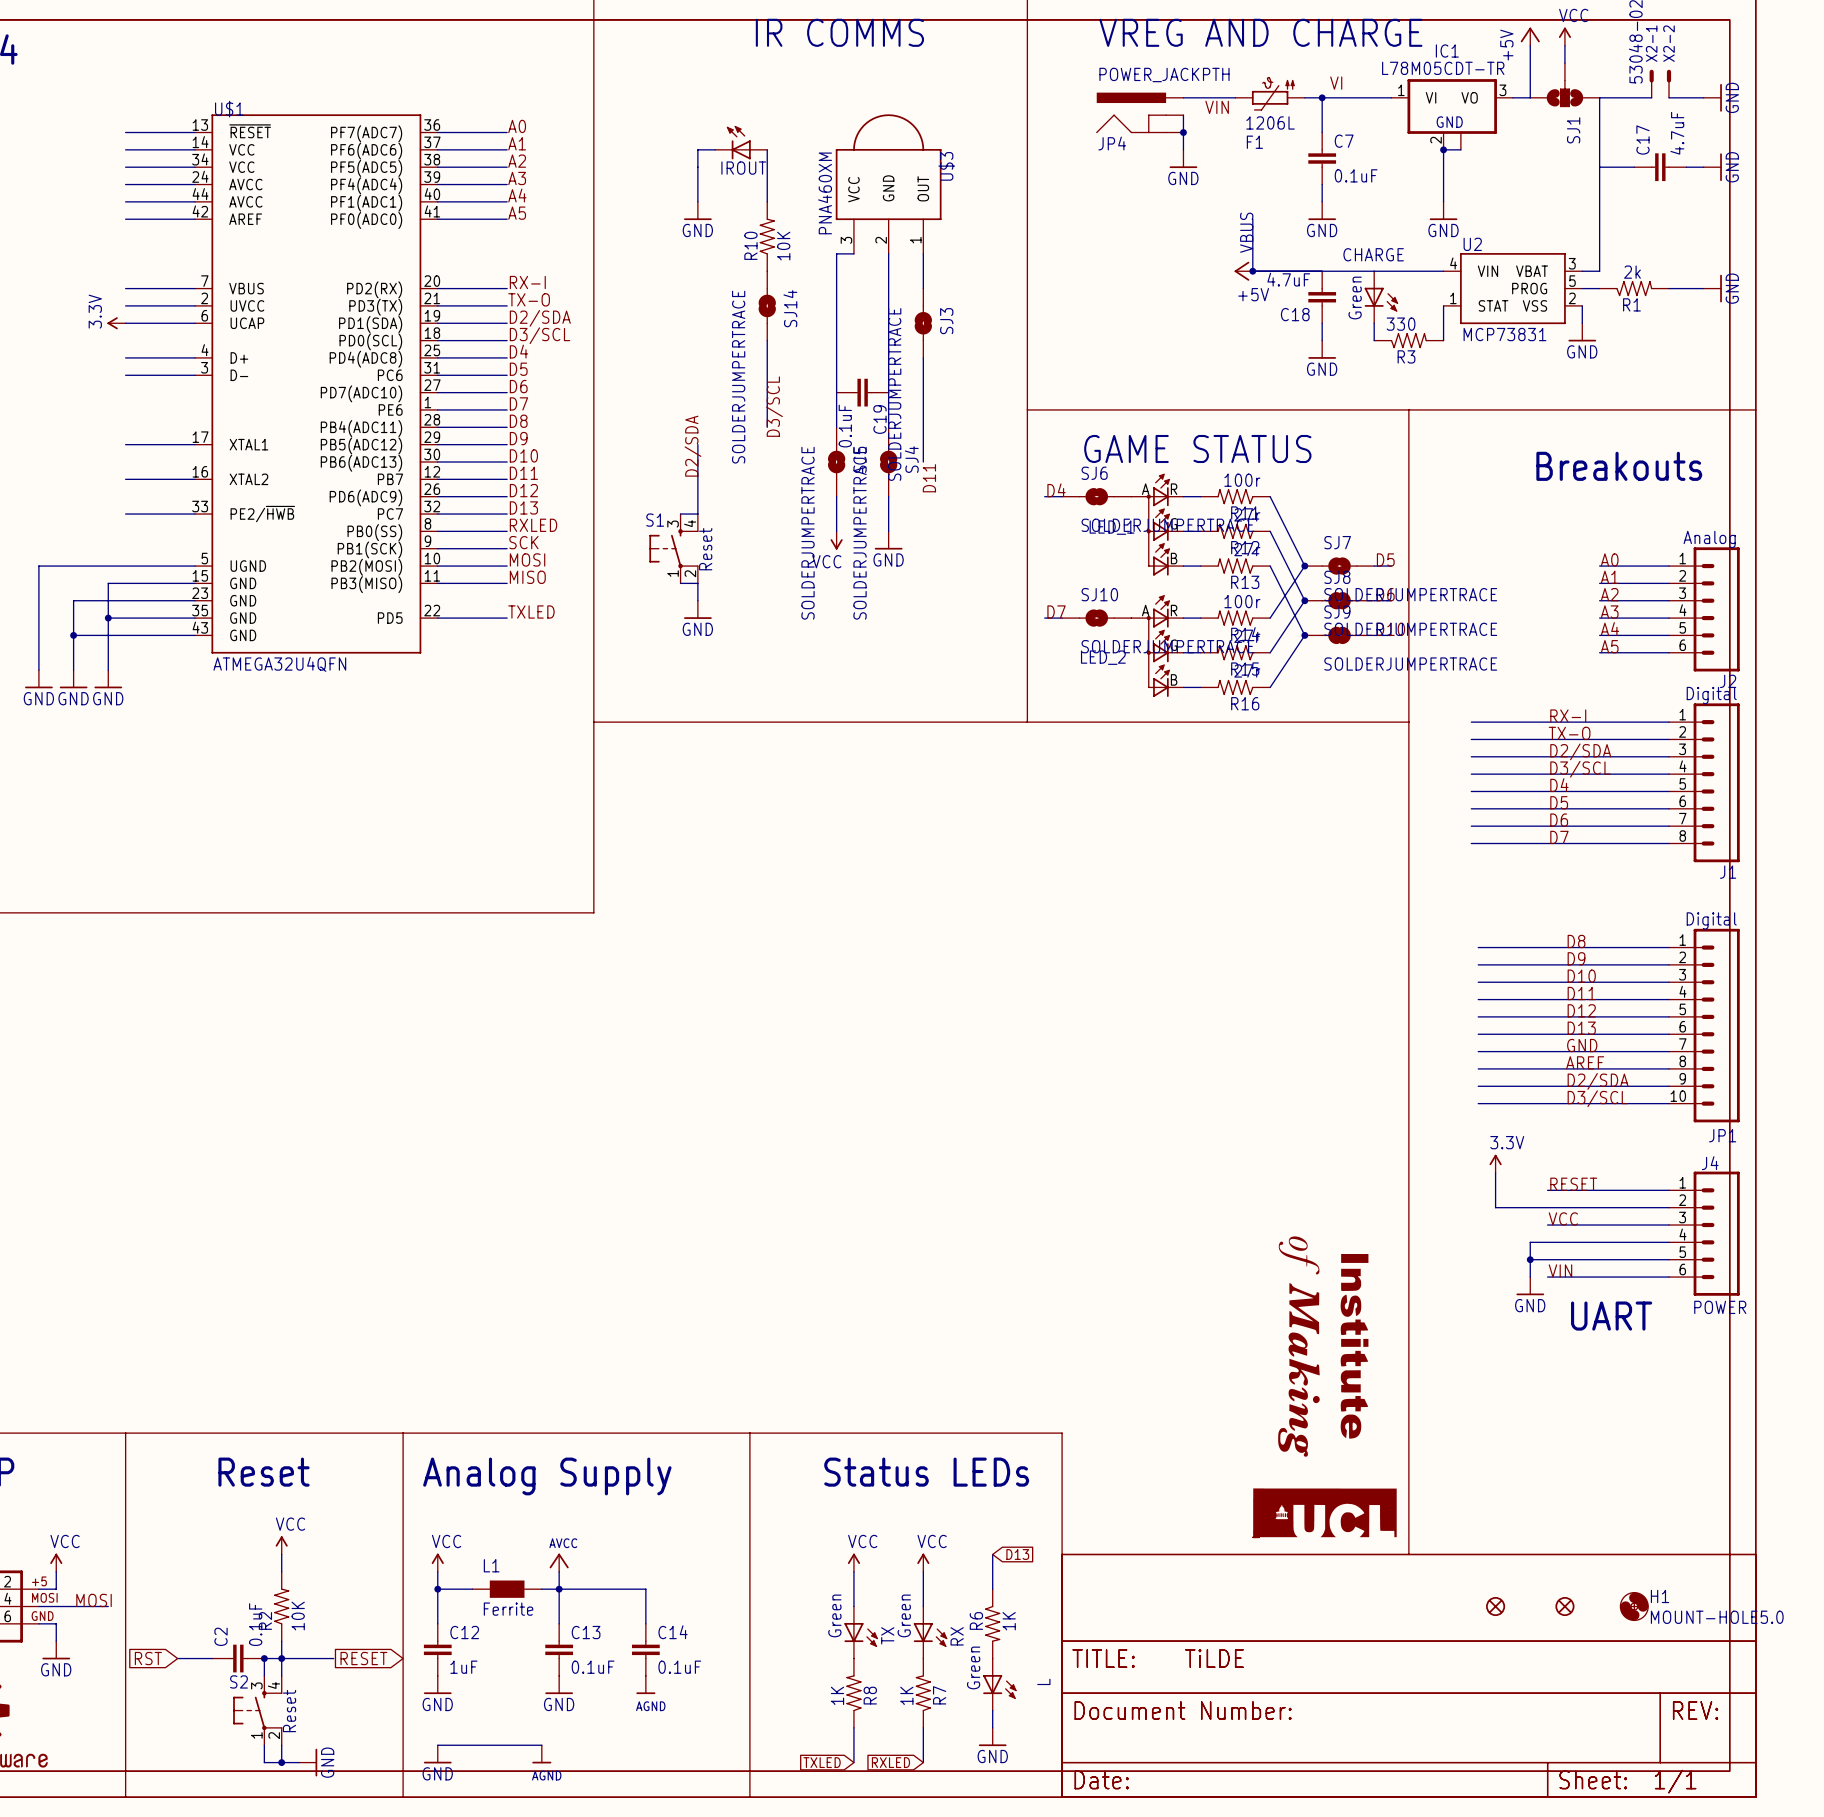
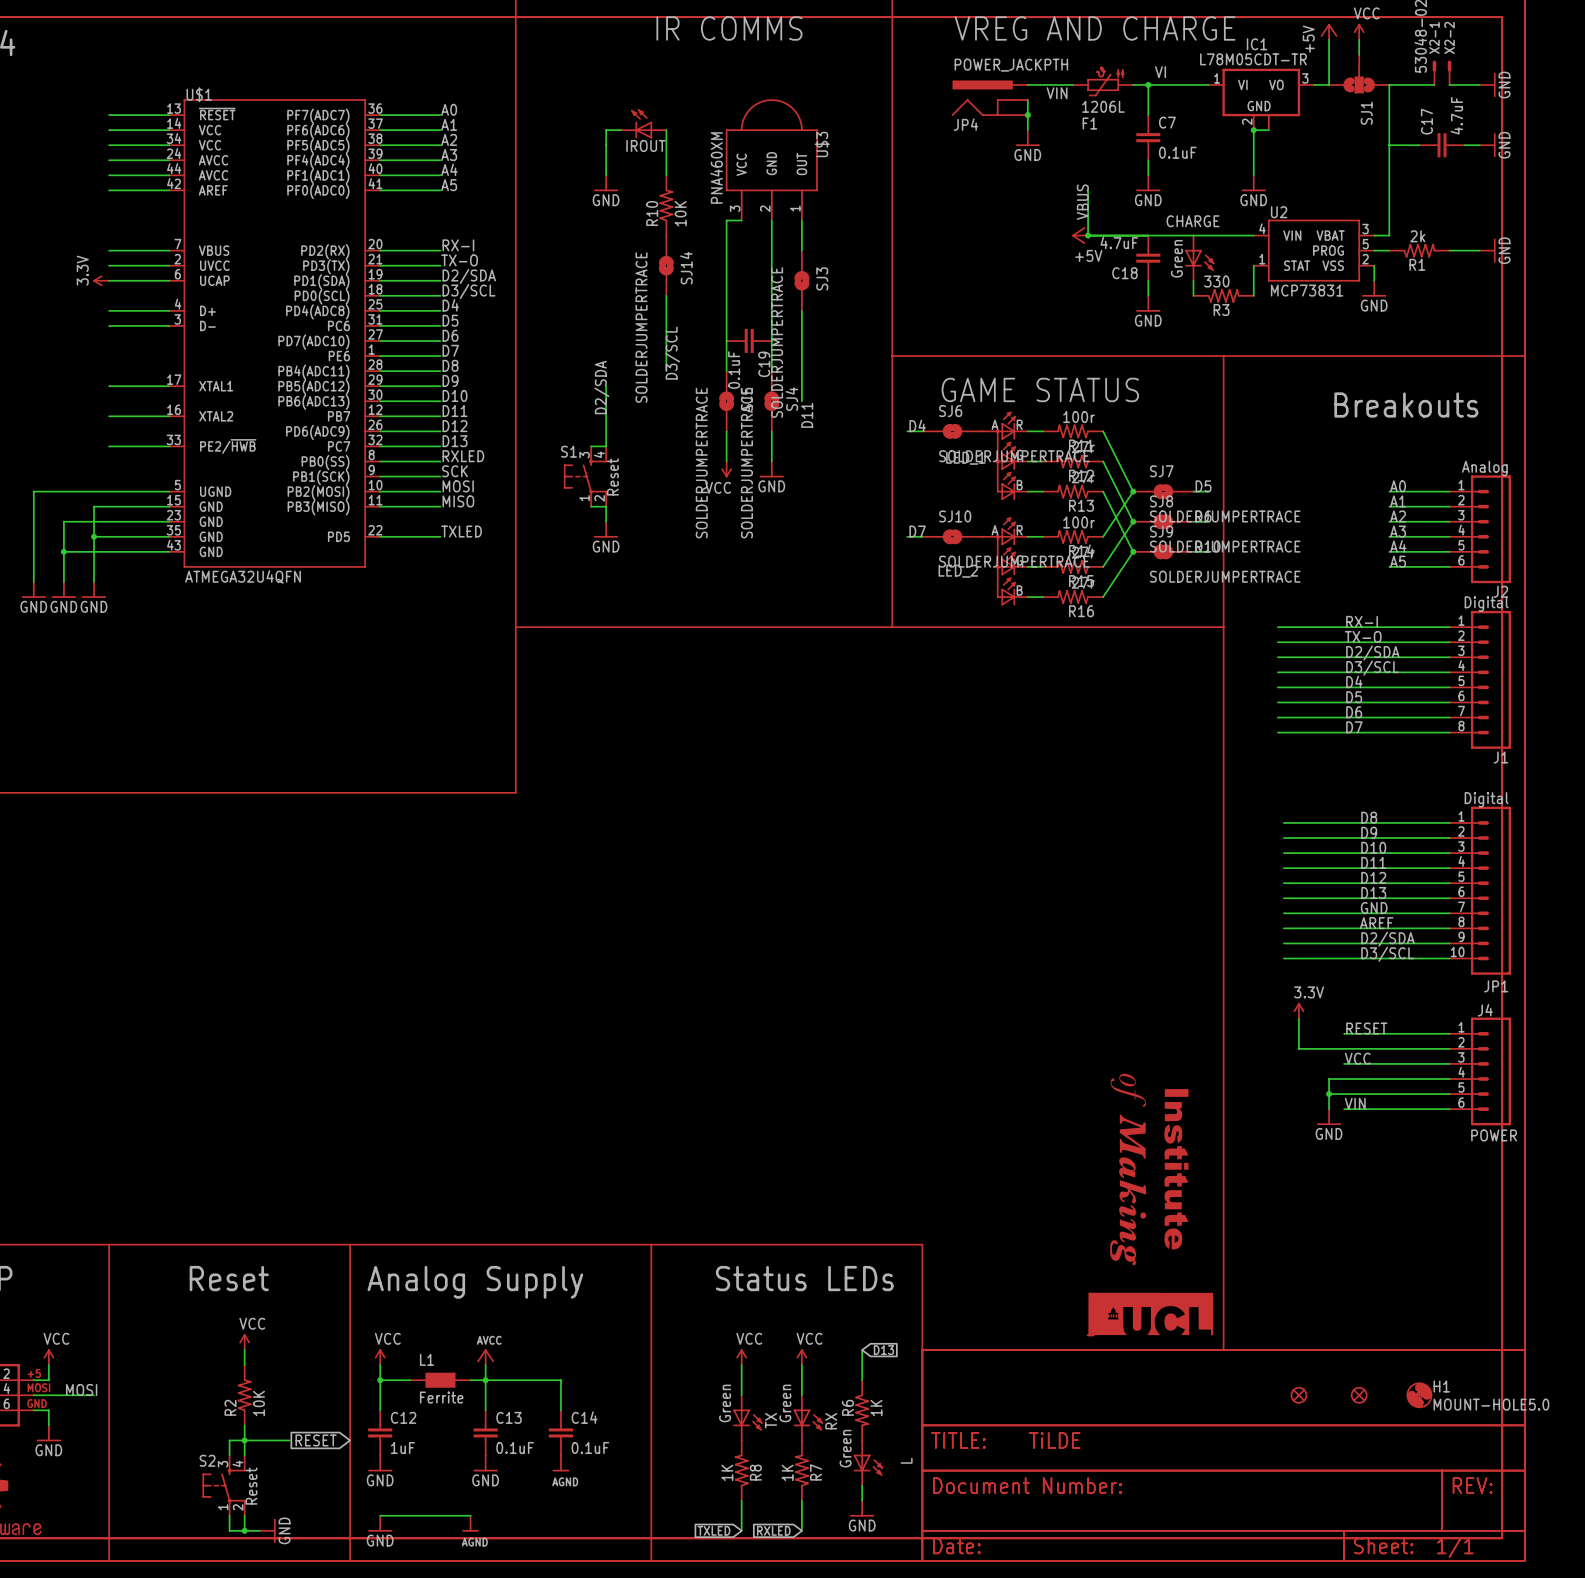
text: UART (1611, 1316) -> none
global label: RST (148, 1658) -> none
wire: (177, 1658) (212, 1658) -> none
C2: 0.1uF (238, 1658) -> none
junction: (264, 1658) -> none

